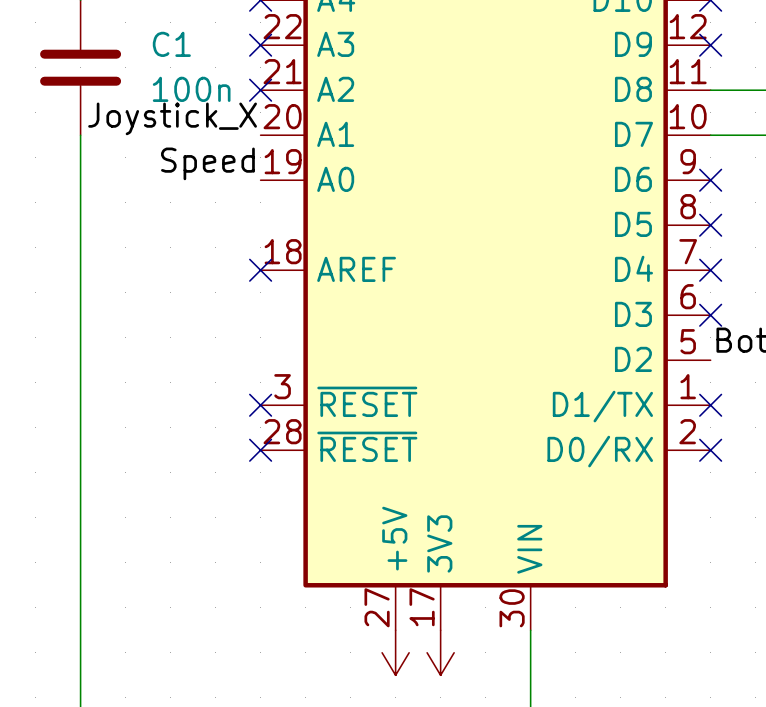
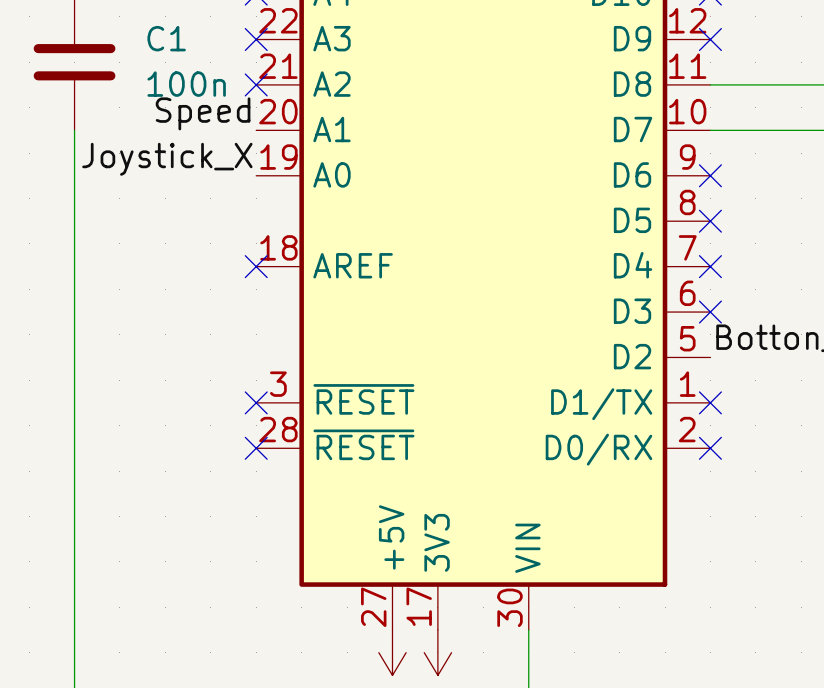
label: Joystick_X (172, 118) -> Speed (203, 113)
label: Speed (207, 163) -> Joystick_X (167, 159)

